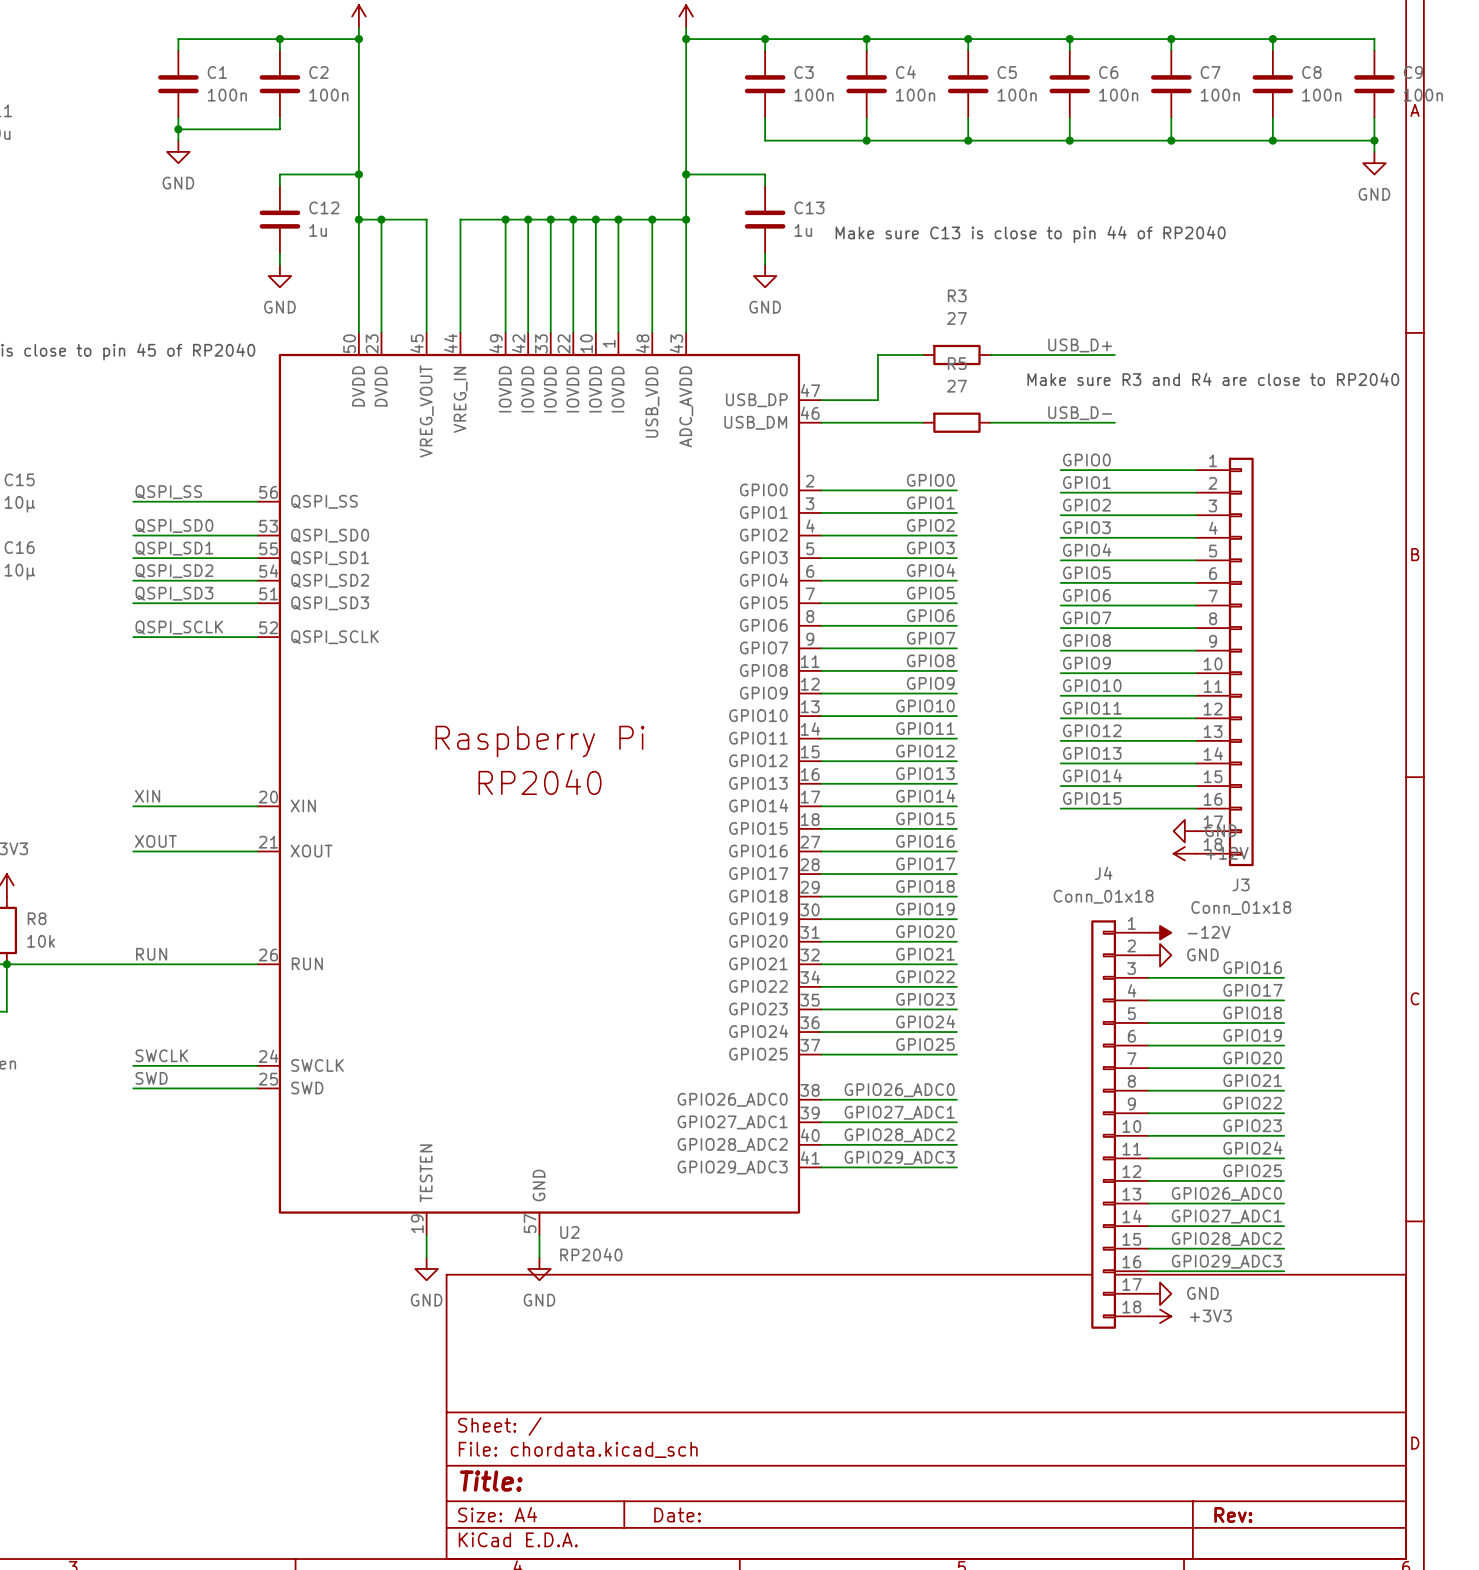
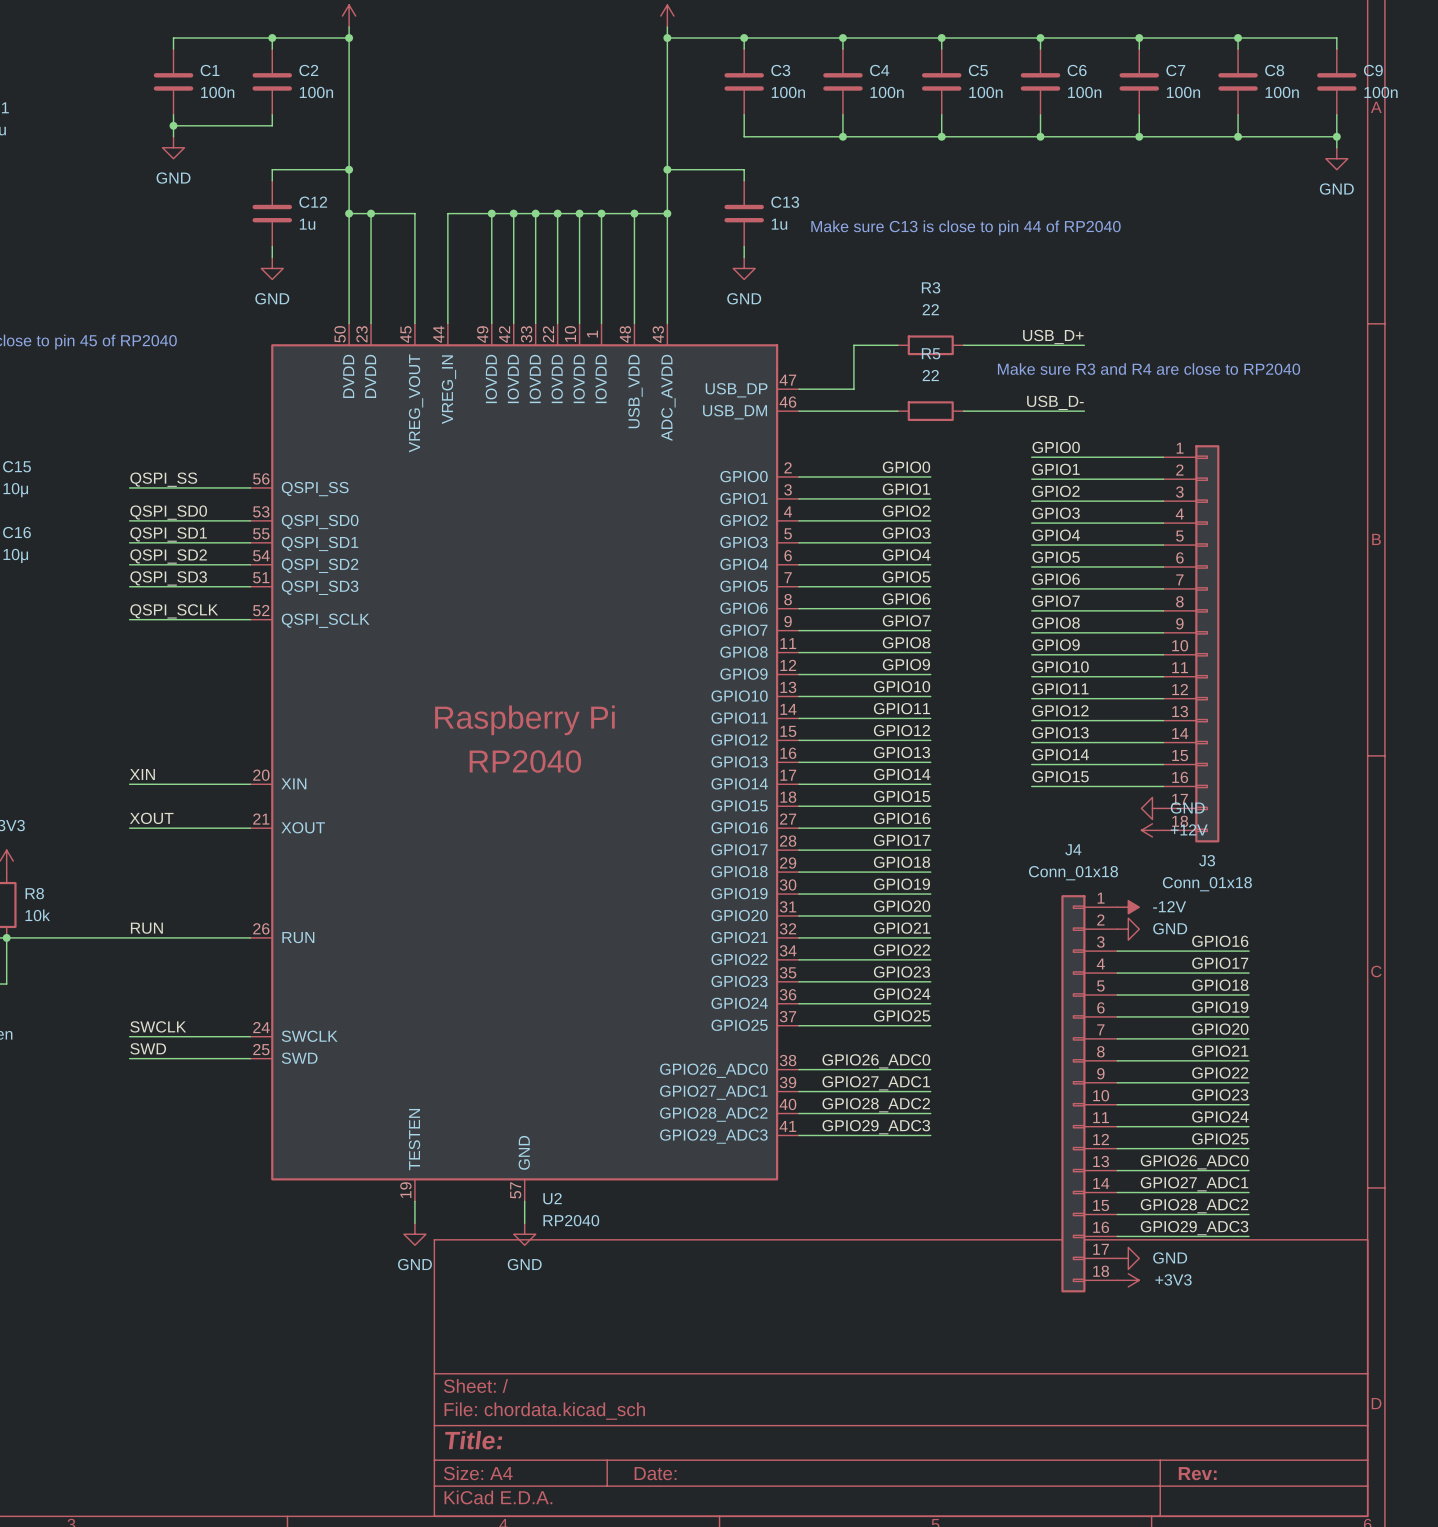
R3 value: 27 (956, 318) -> 22 (930, 309)
R5 value: 27 (956, 386) -> 22 (930, 375)

